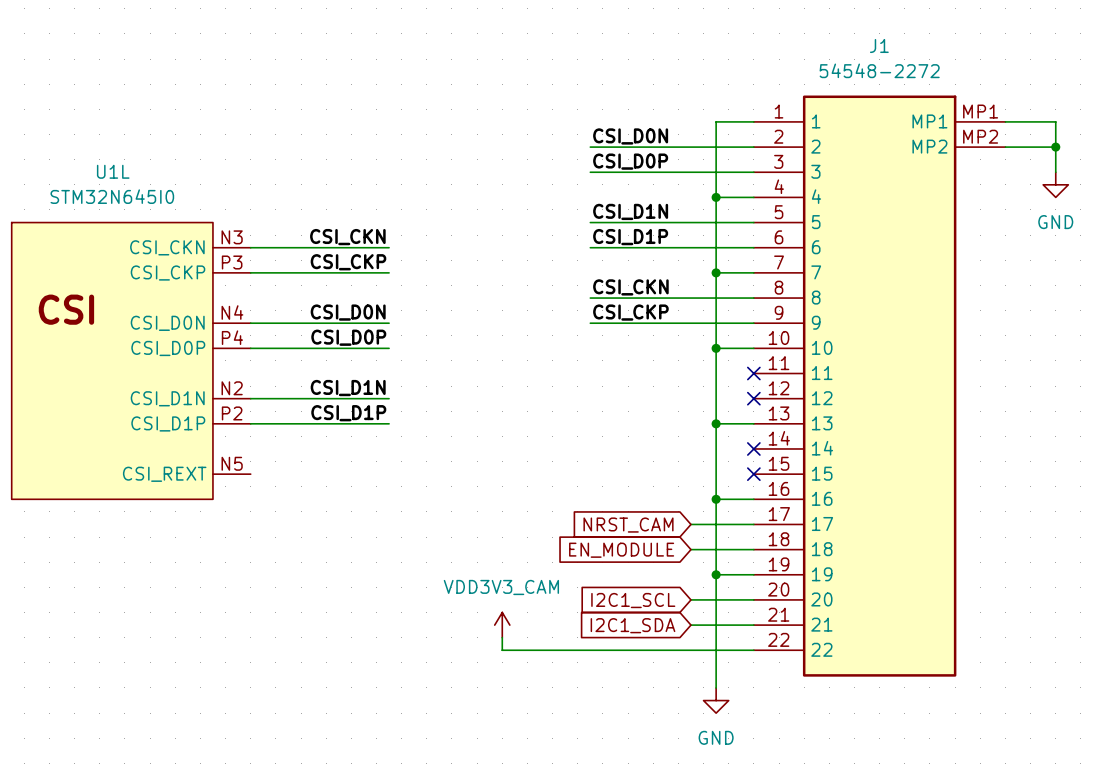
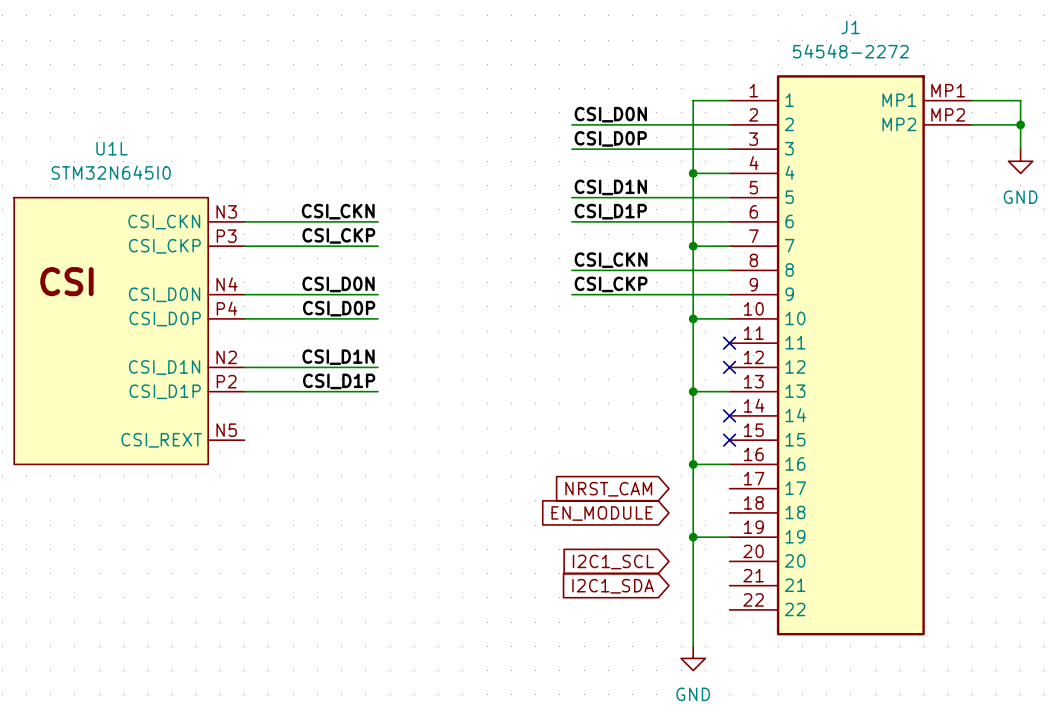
wire: (690, 524) (753, 524) -> none
wire: (690, 549) (753, 549) -> none
wire: (690, 599) (753, 599) -> none
power symbol: VDD3V3_CAM (502, 625) -> none
wire: (690, 625) (753, 625) -> none
wire: (502, 637) (502, 650) (753, 650) -> none

